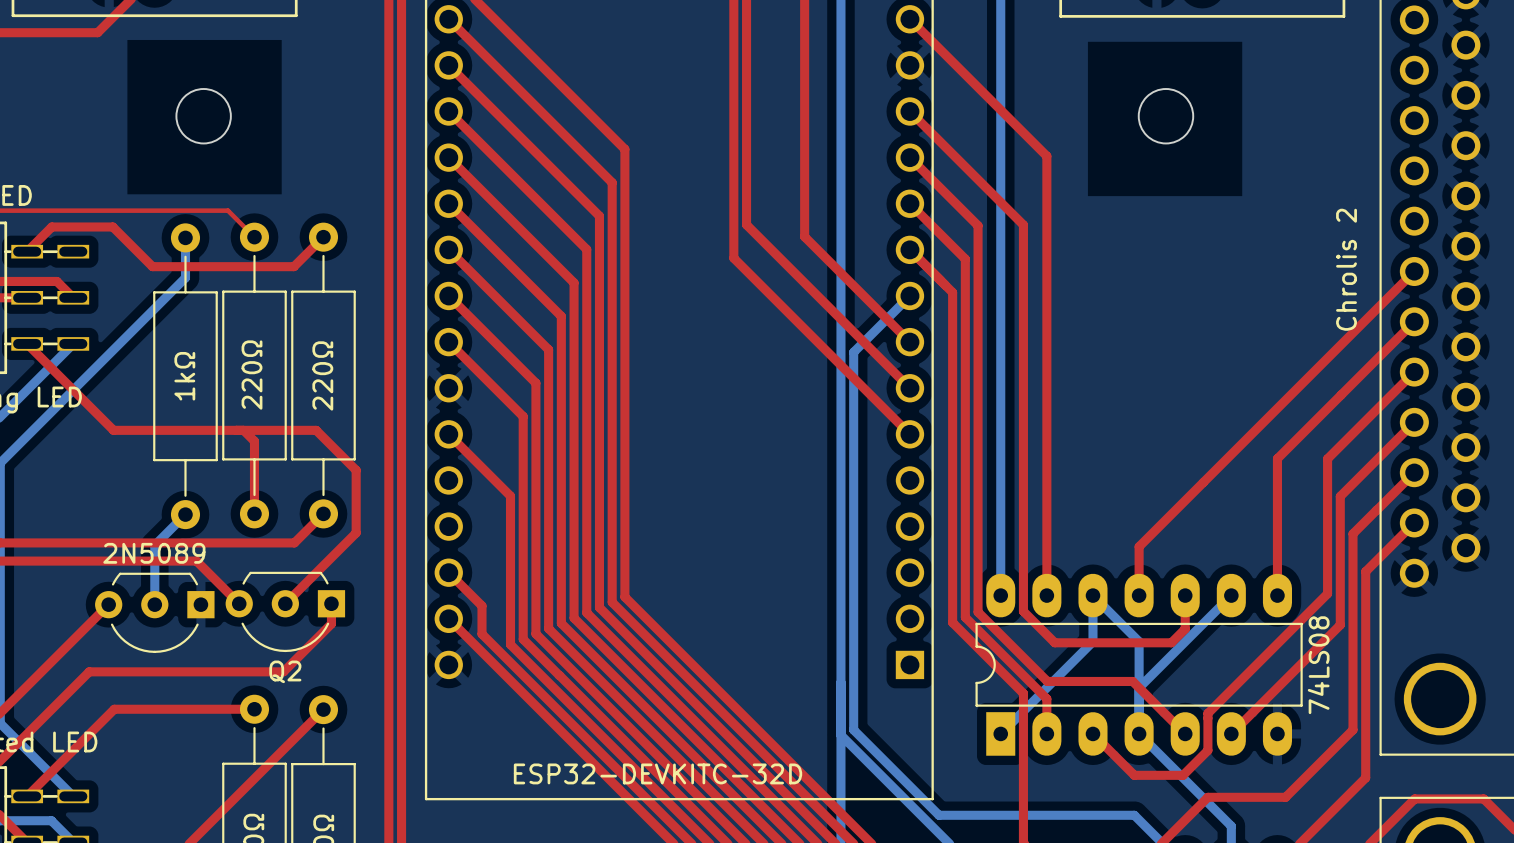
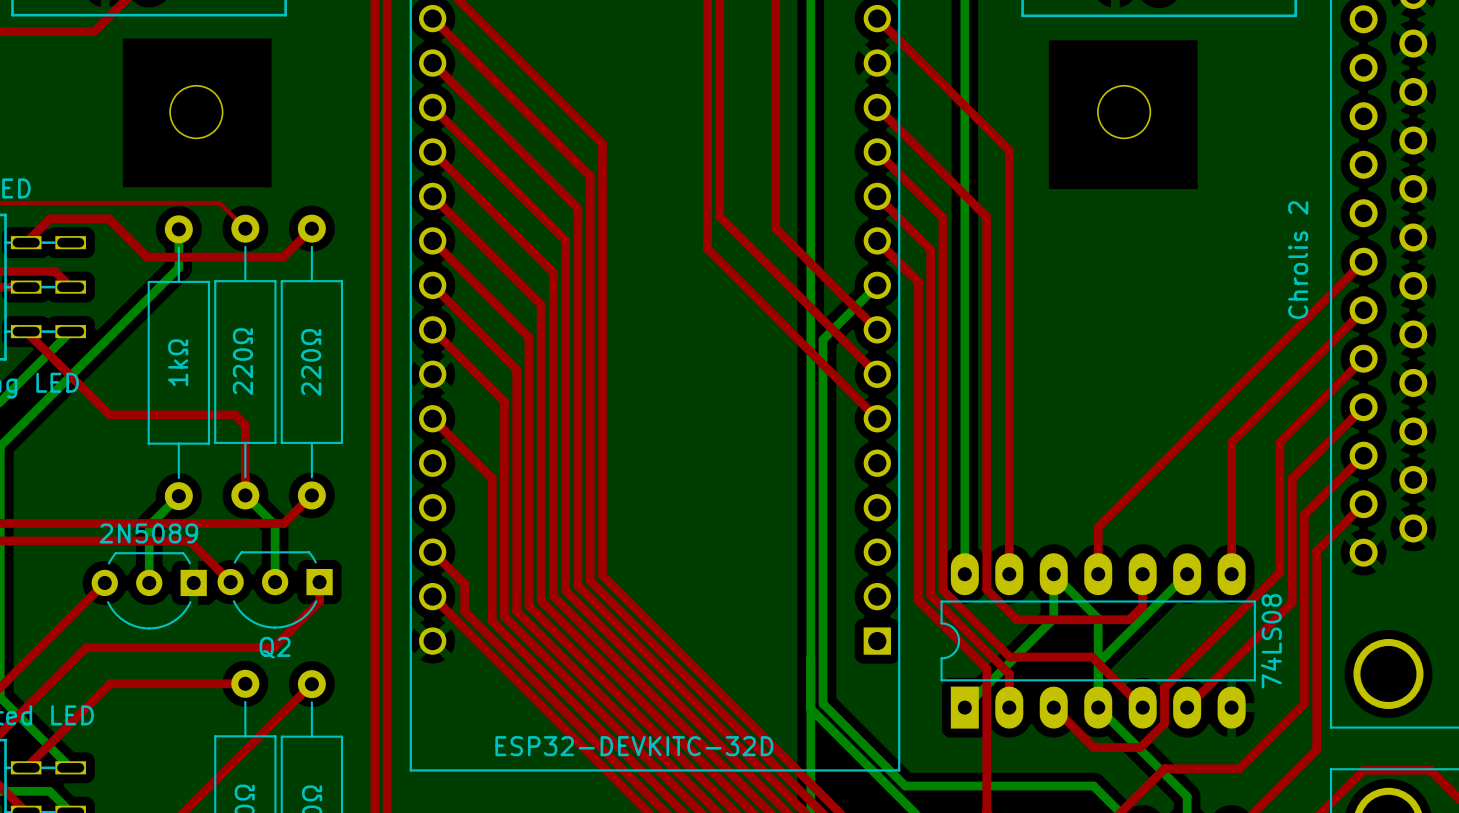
top track: (243, 430) (316, 430) (356, 470) (356, 532) (285, 603) -> none
bottom track: none -> (245, 495) (275, 525) (275, 582)

